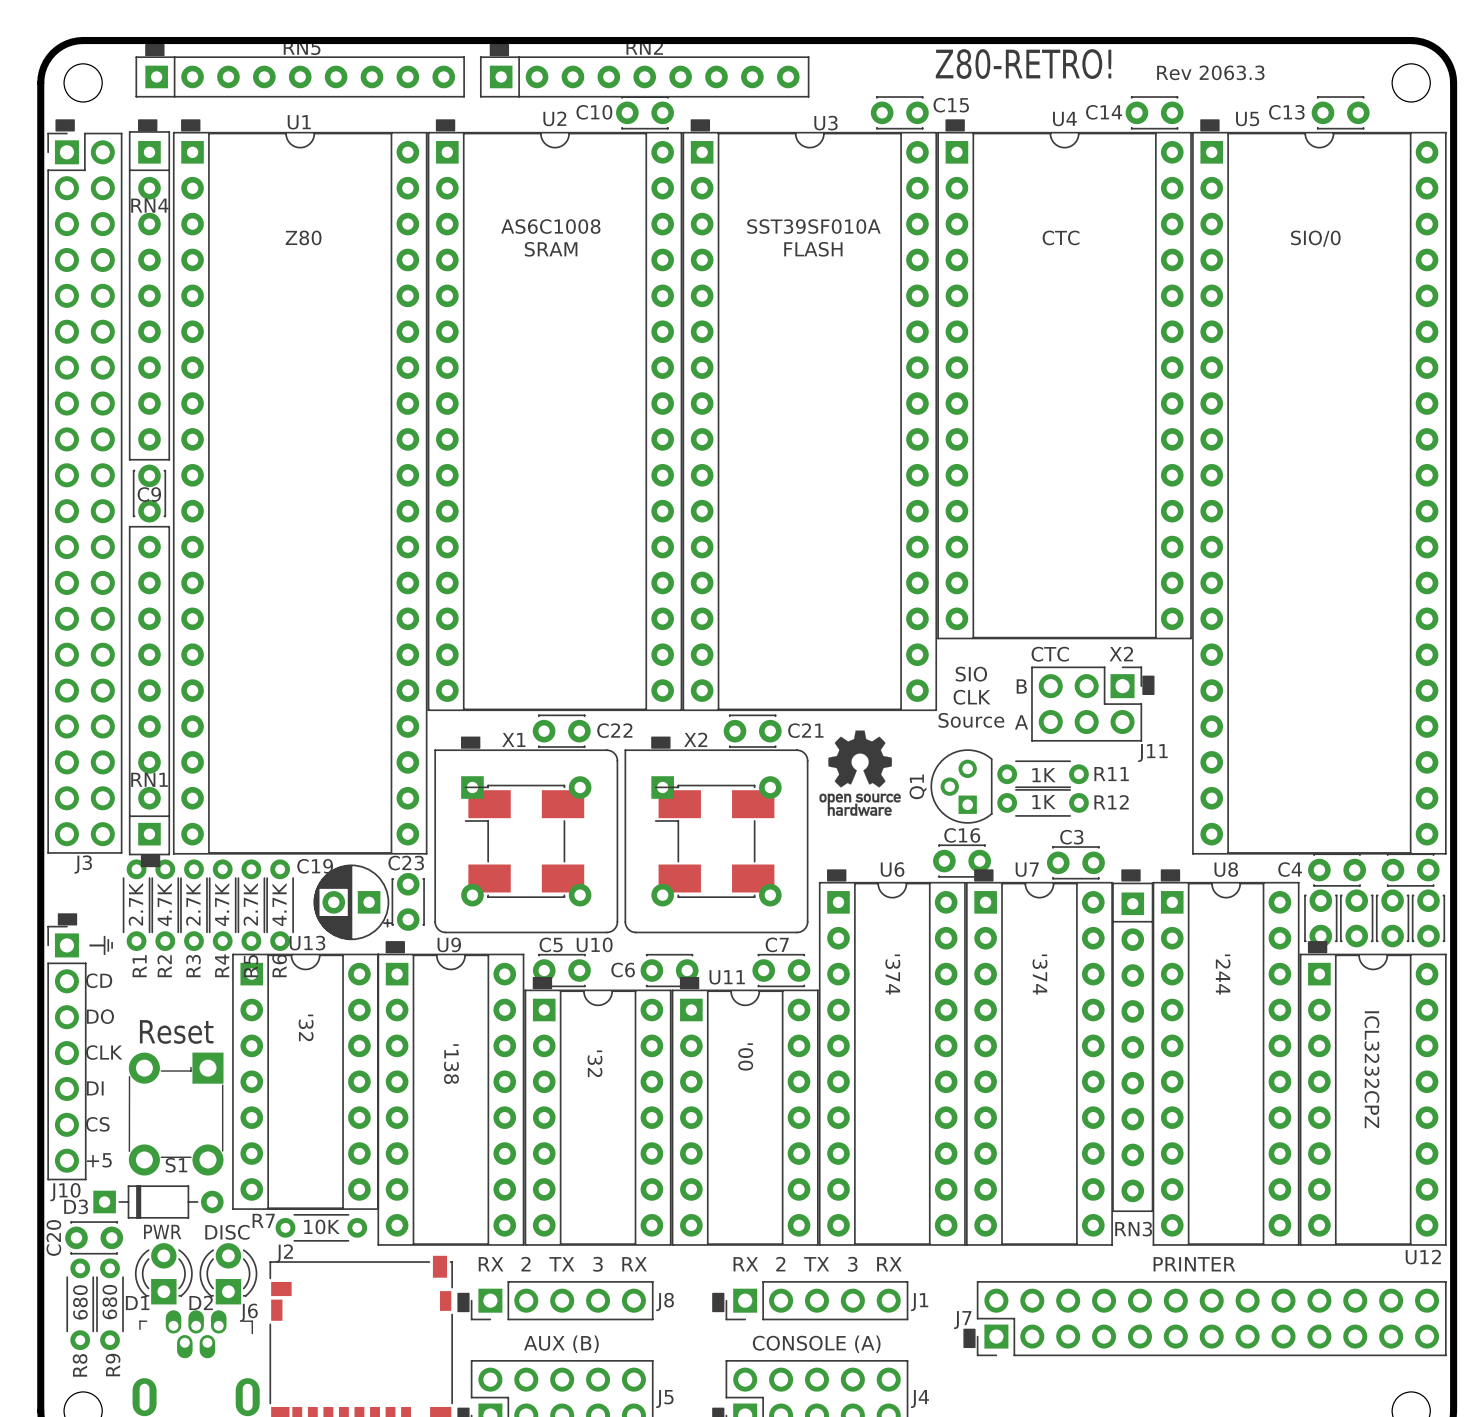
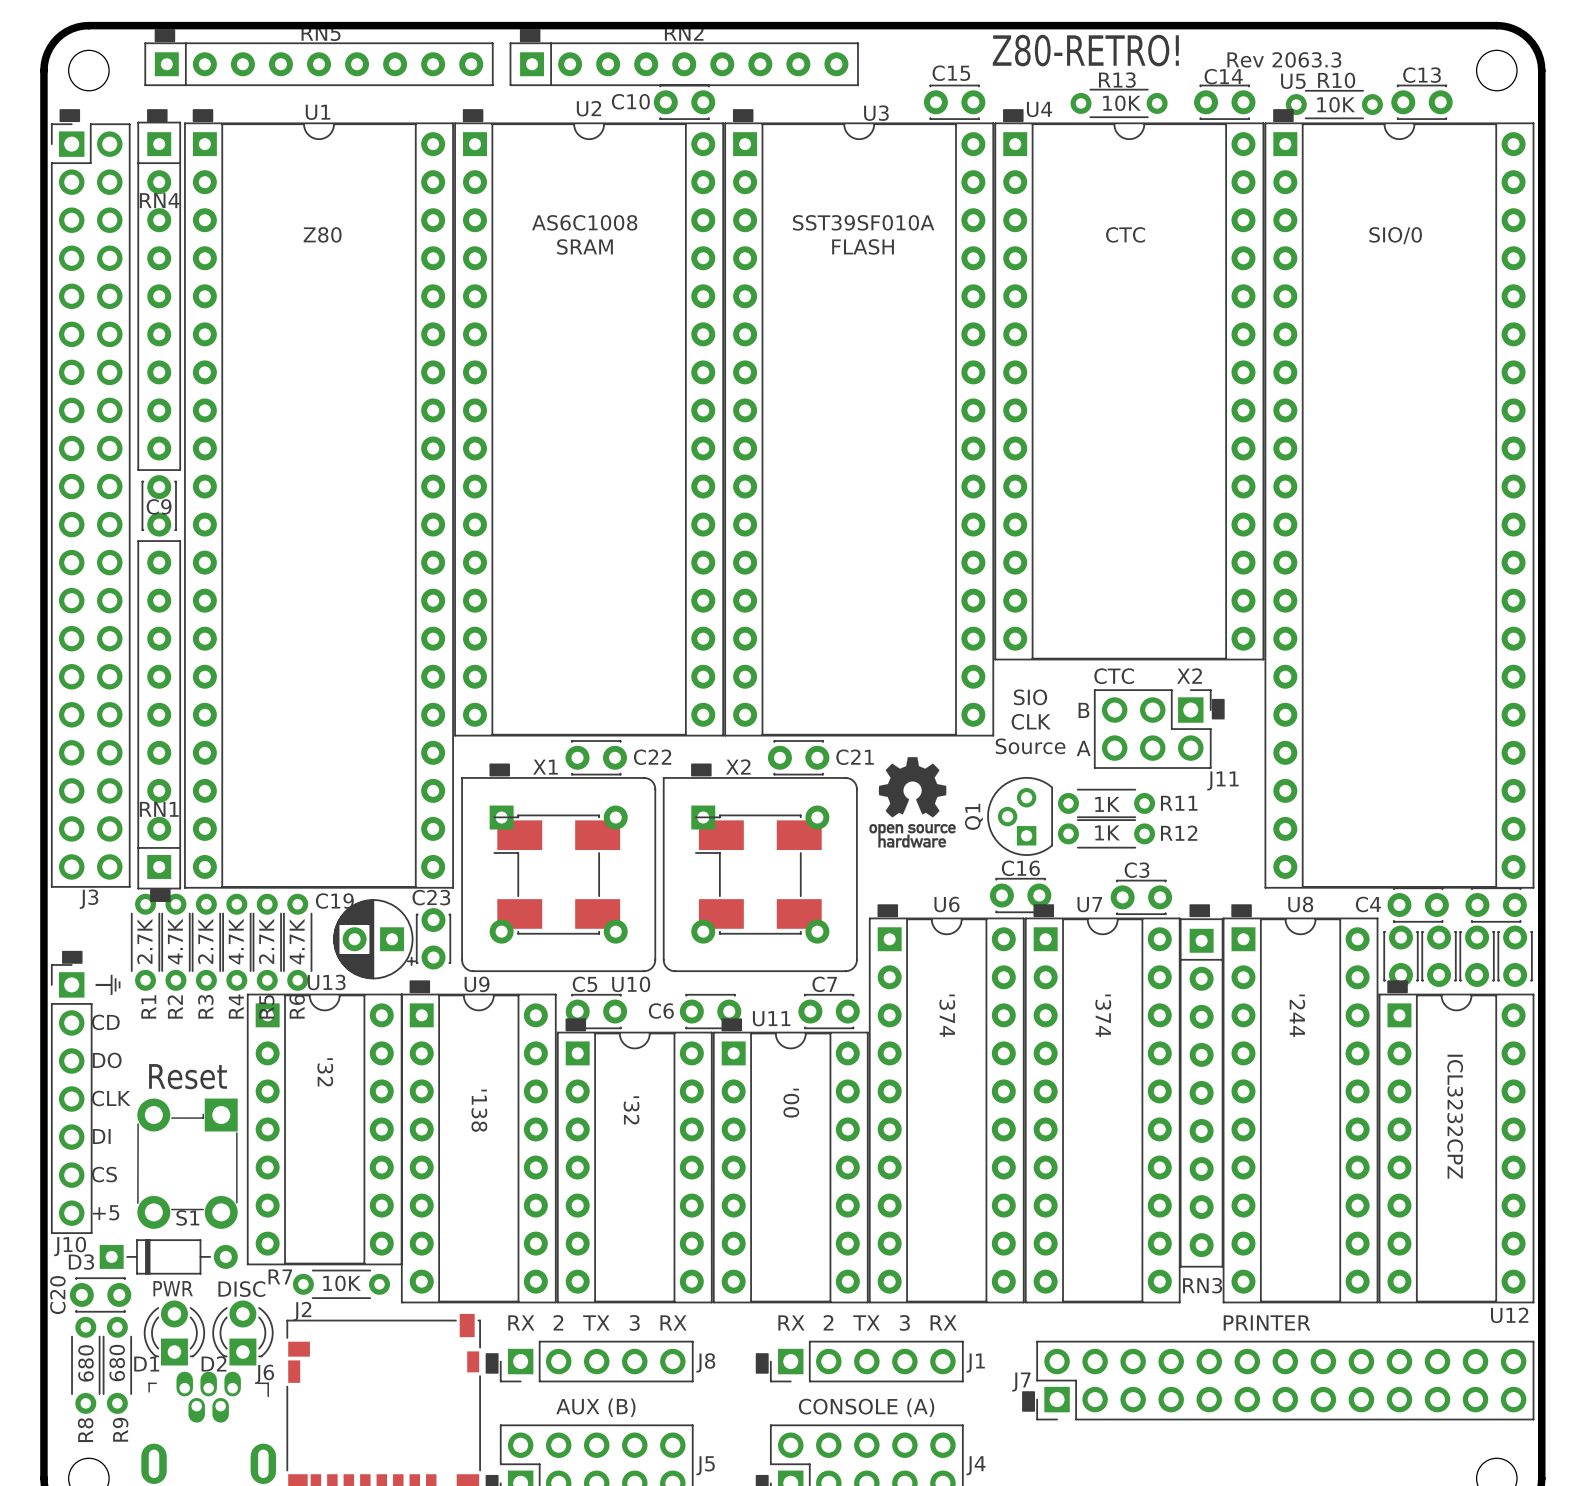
C15 name position: C15 (951, 105) -> C15 (951, 73)
C14 name position: C14 (1104, 112) -> C14 (1223, 76)
C13 name position: C13 (1286, 112) -> C13 (1422, 75)
R13: none -> (1119, 103)
text: none -> 10K (1121, 103)
R10: none -> (1334, 104)
text: none -> 10K (1336, 104)
U4 name position: U4 (1064, 119) -> U4 (1039, 109)
U5 name position: U5 (1247, 119) -> U5 (1293, 81)

